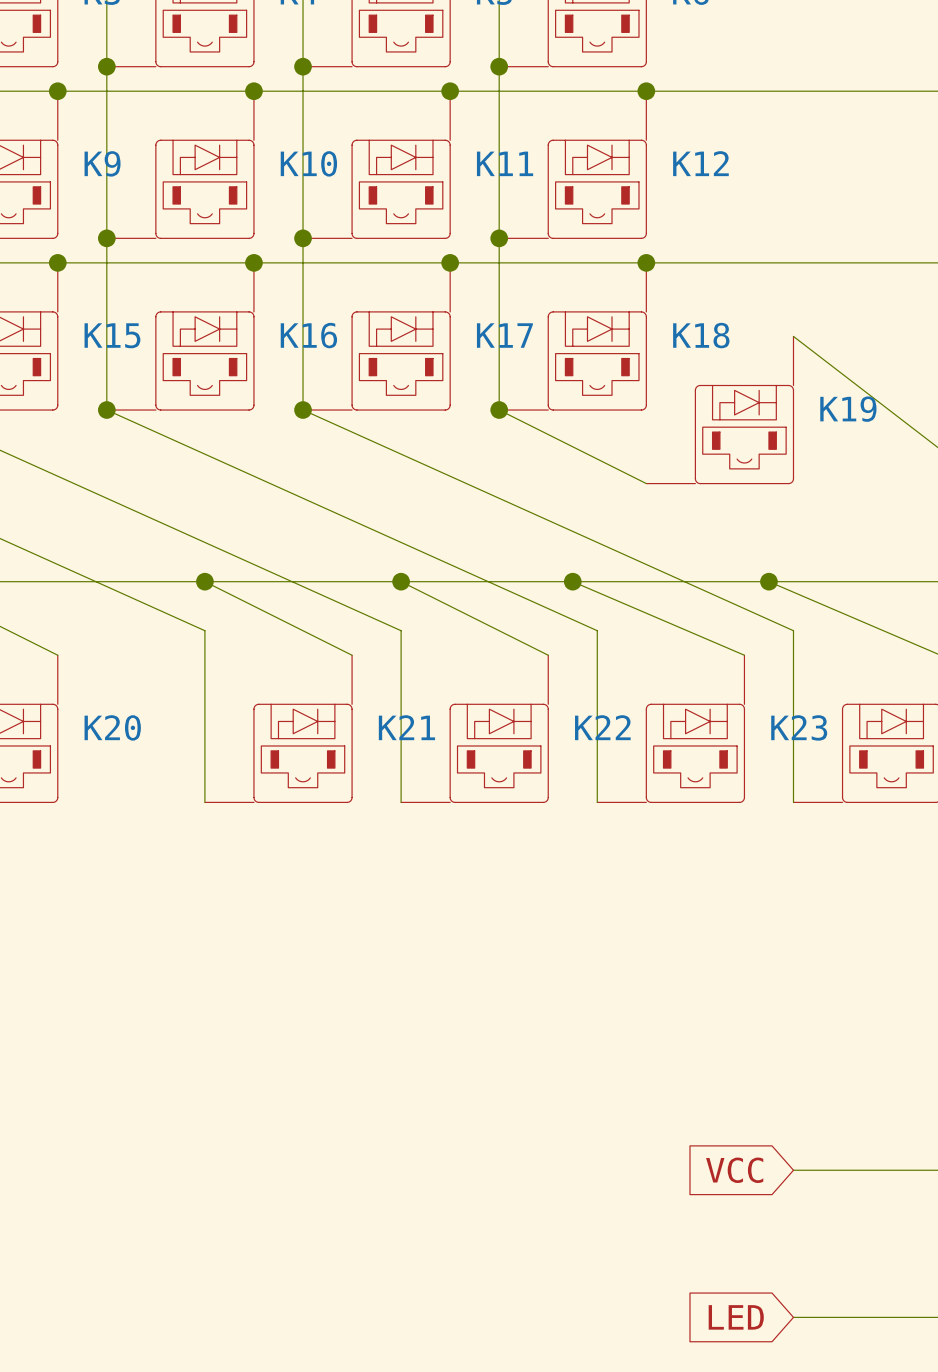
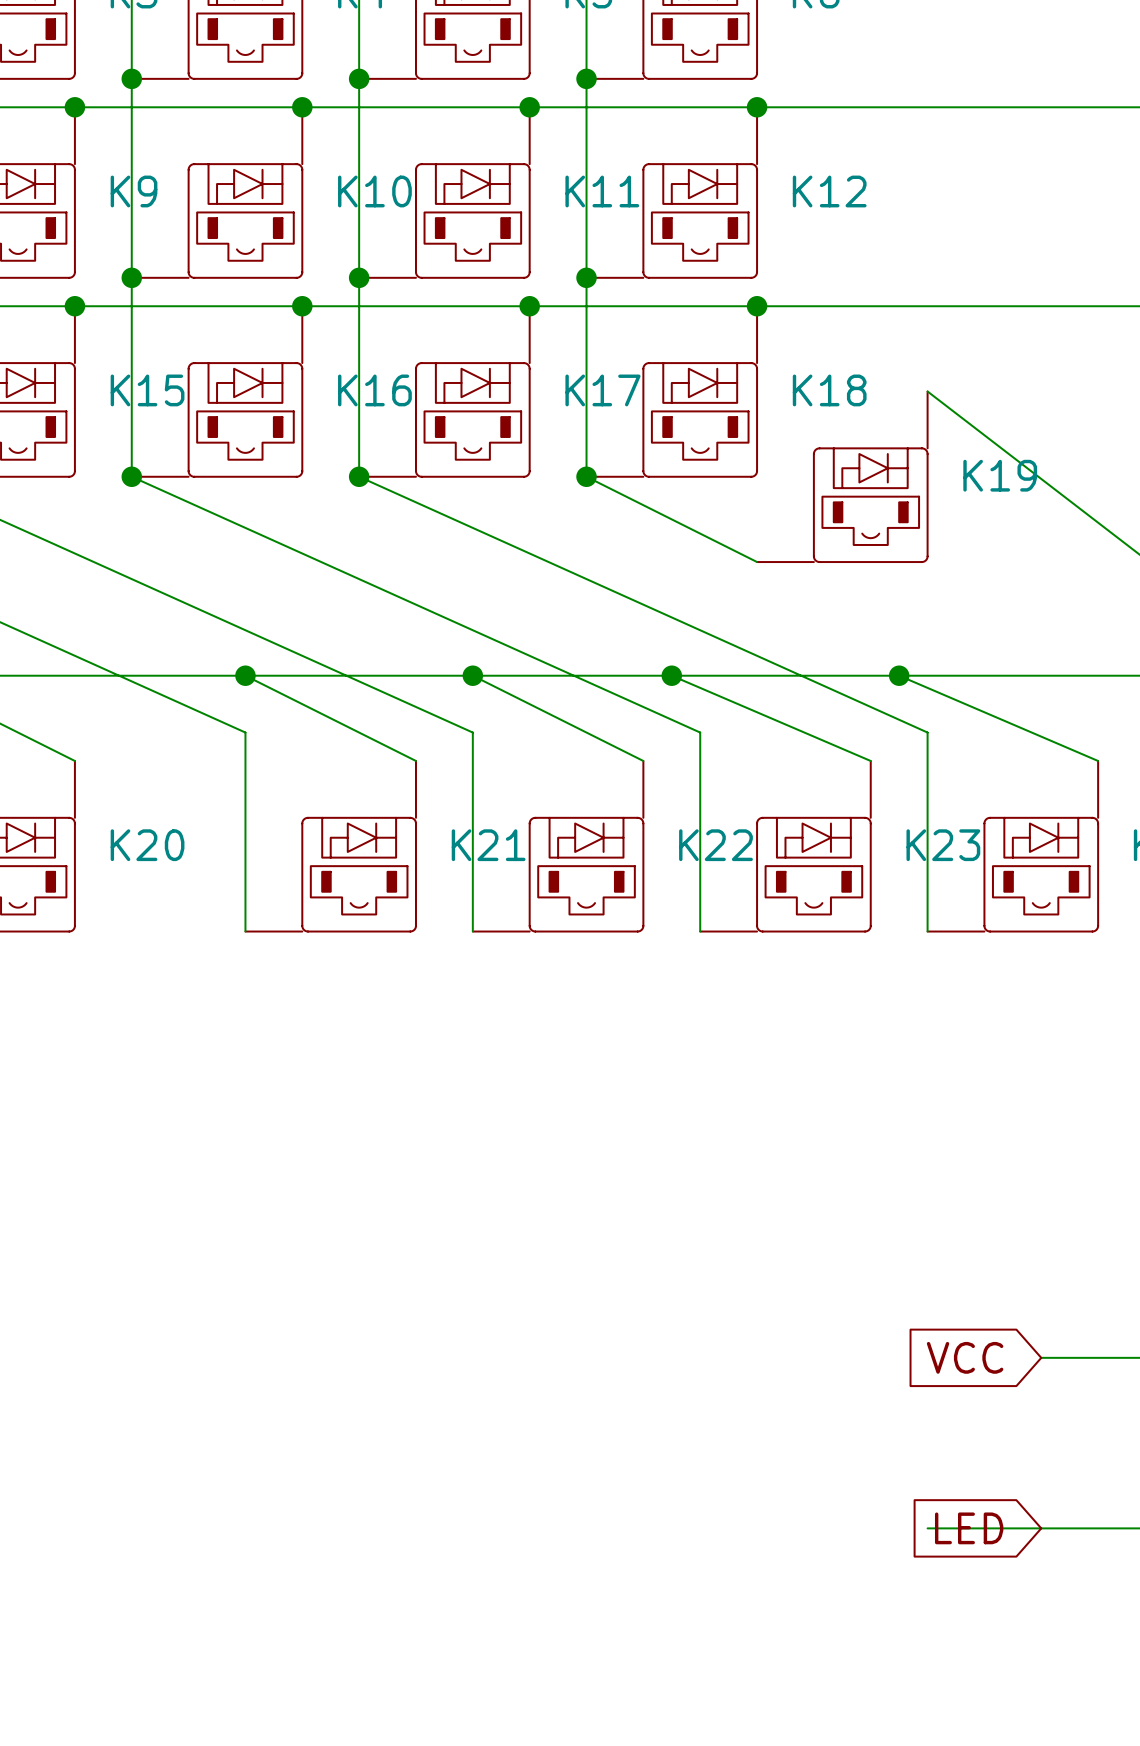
global label position: VCC (734, 1170) -> VCC (965, 1357)
wire: (793, 1170) (891, 1170) -> none
global label position: LED (736, 1317) -> LED (969, 1528)

